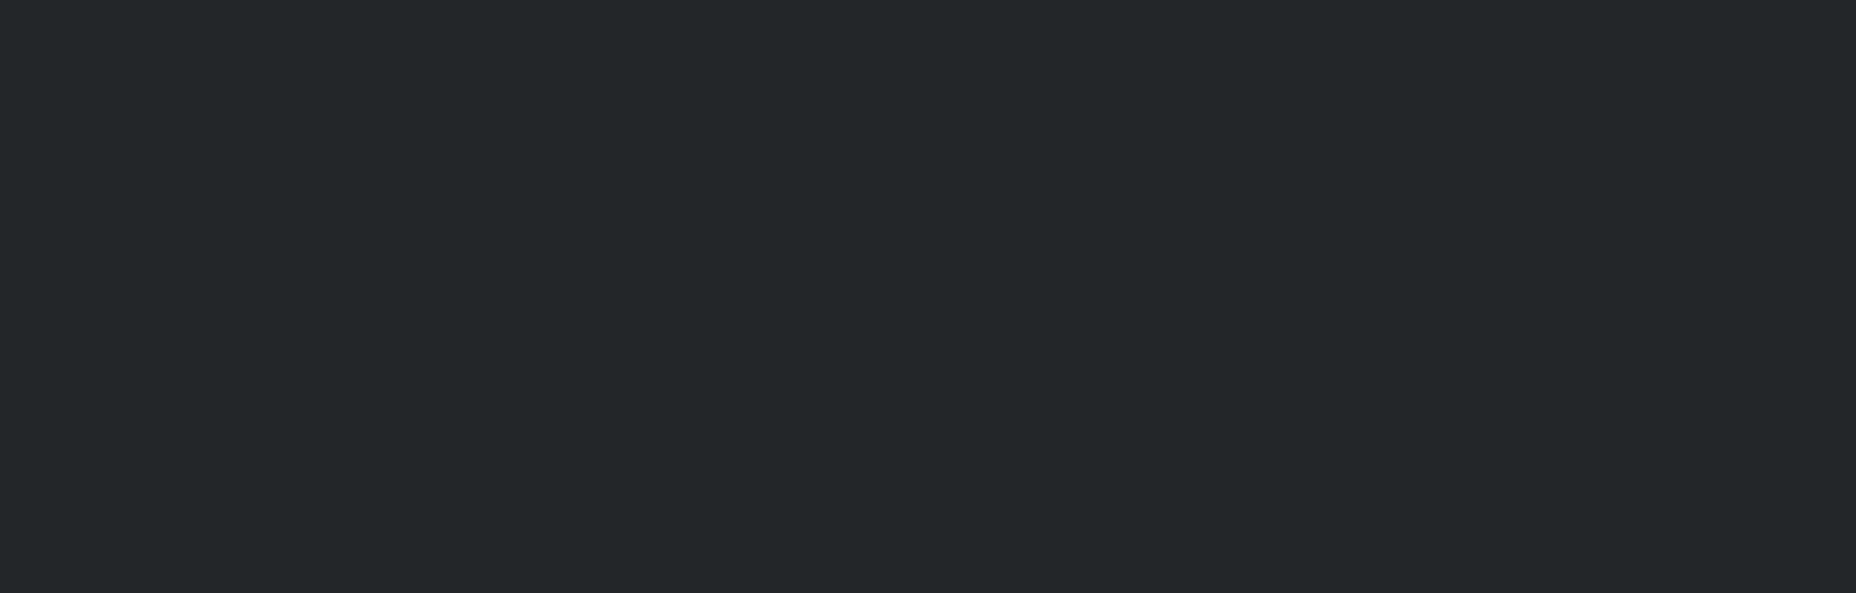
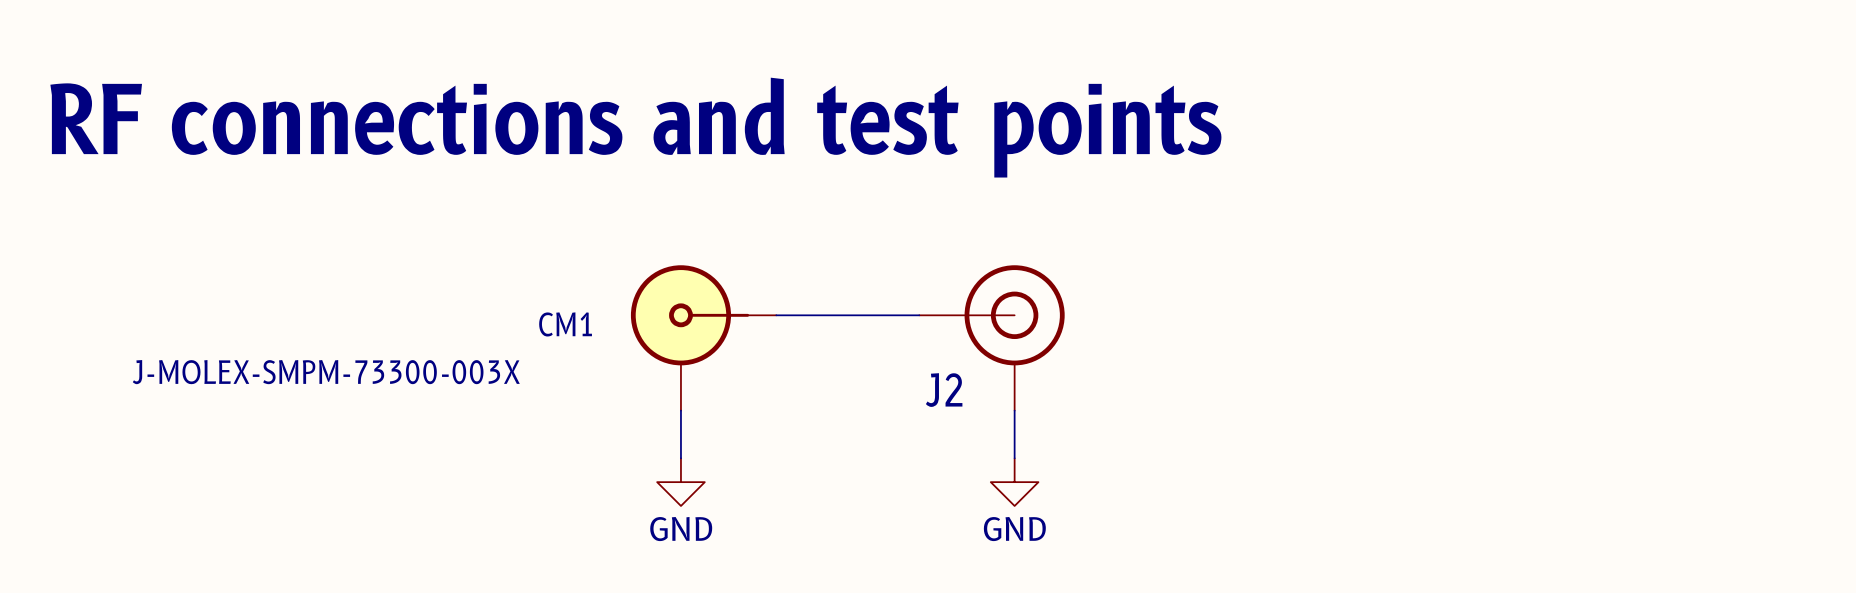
text: none -> RF connections and test points (635, 127)
wire: none -> (776, 315) (919, 315)
CM1: none -> J-MOLEX-SMPM-73300-003X (703, 337)
J2: none -> (991, 337)
wire: none -> (680, 410) (680, 458)
wire: none -> (1014, 410) (1014, 458)
power symbol: none -> GND (680, 482)
power symbol: none -> GND (1014, 482)

